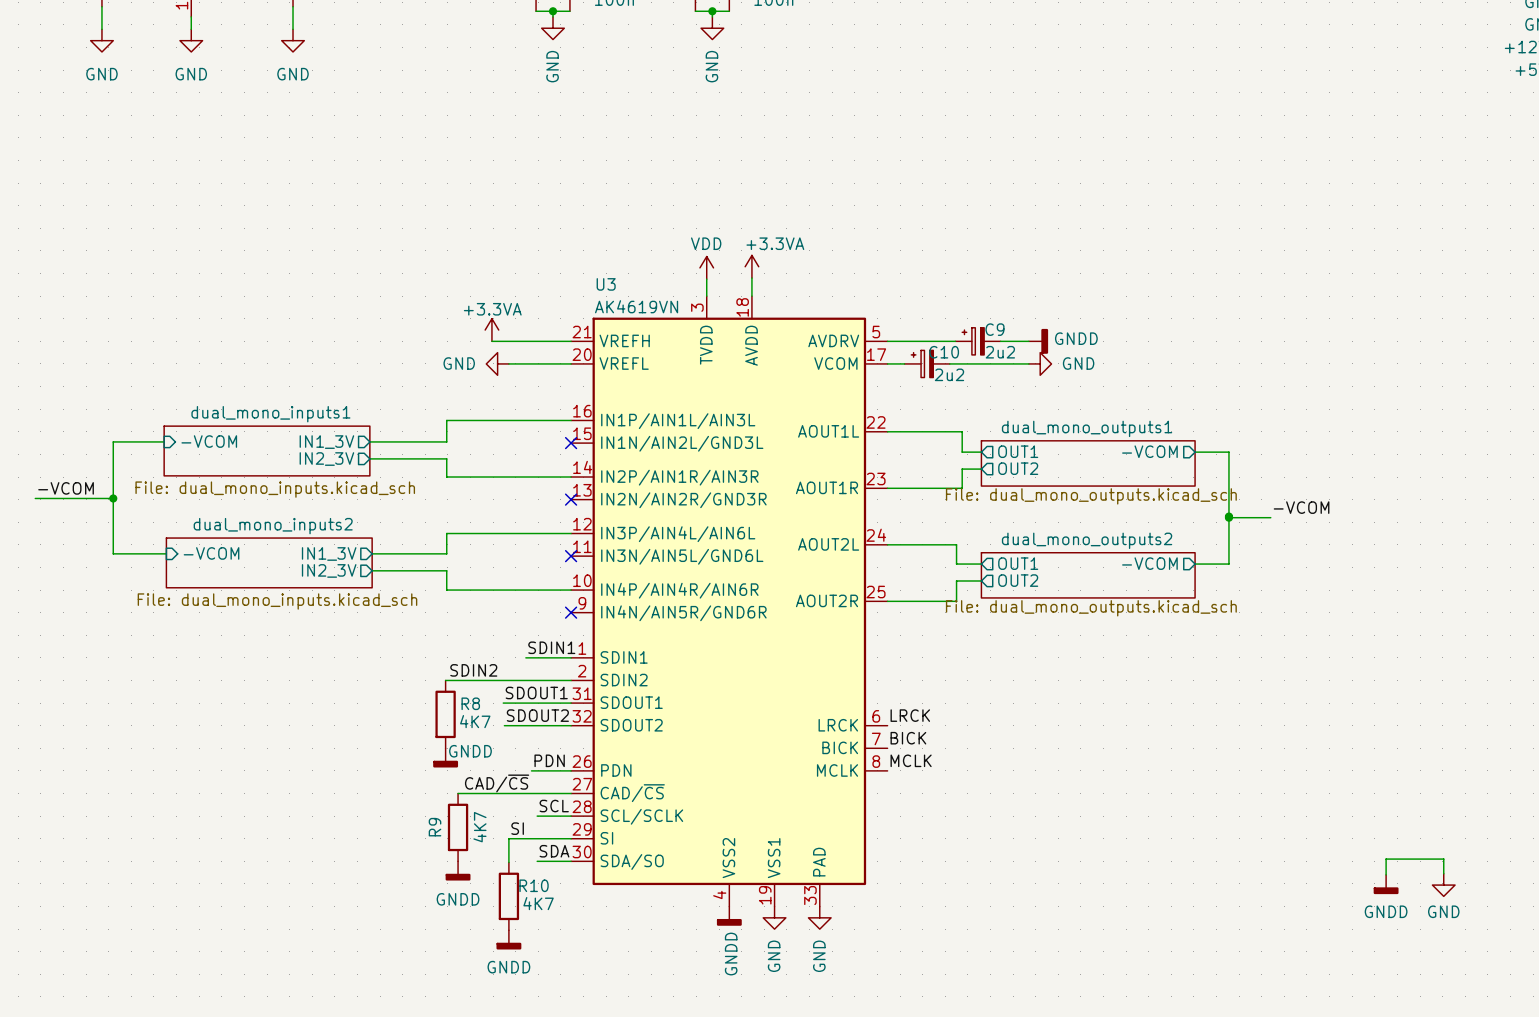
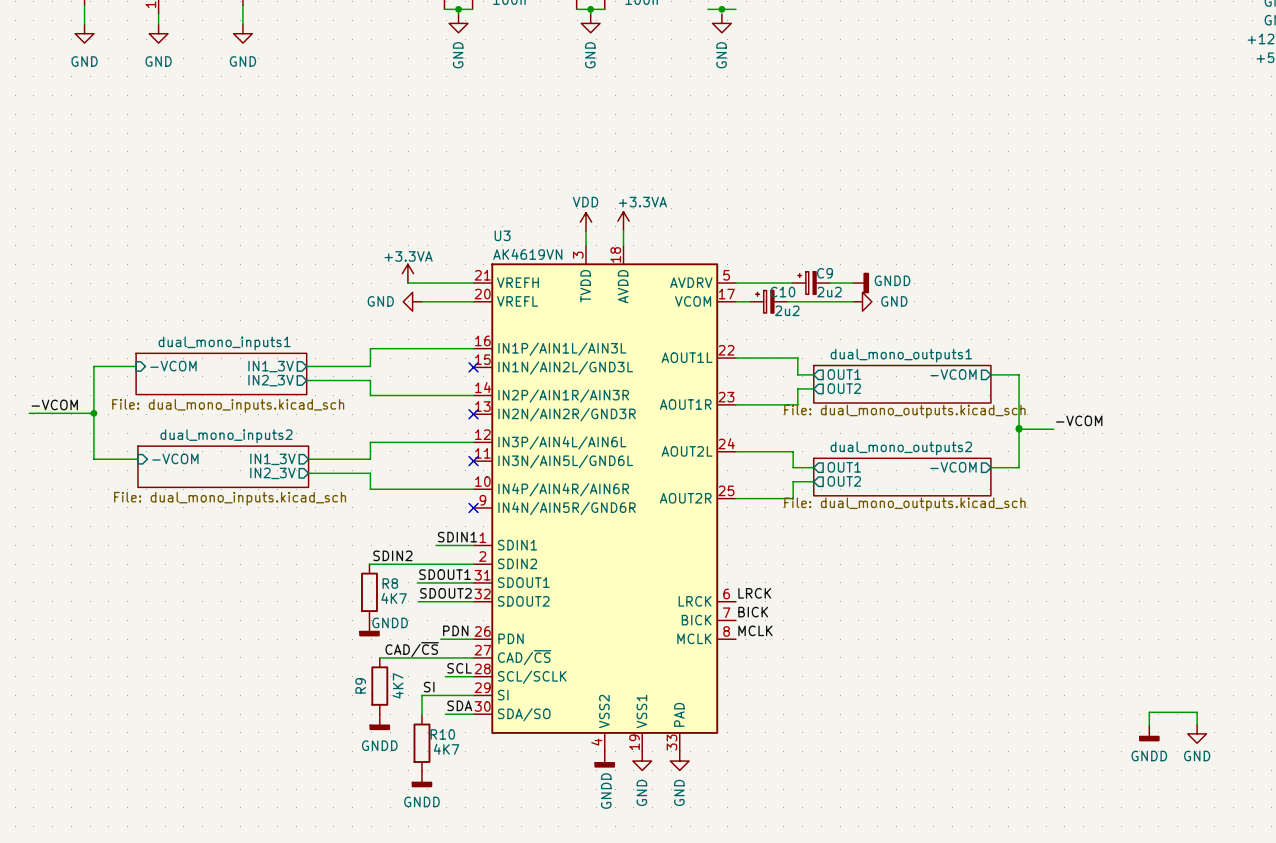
wire: none -> (707, 9) (735, 9)
junction: none -> (721, 9)
power symbol: none -> GND (721, 23)

